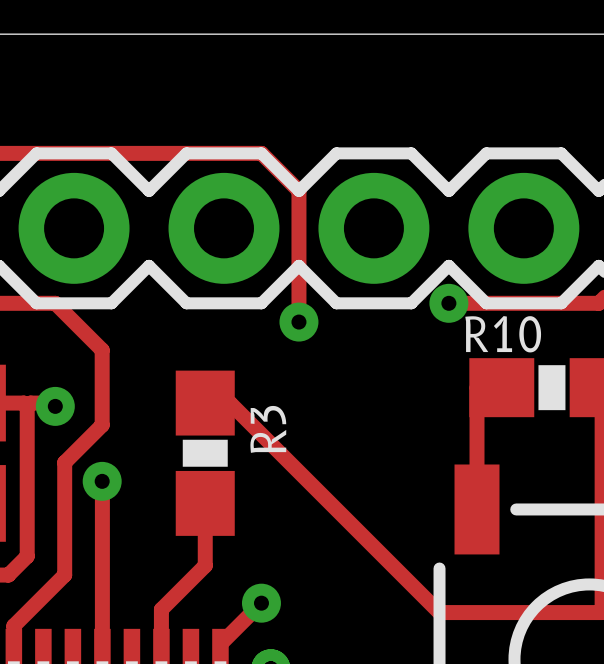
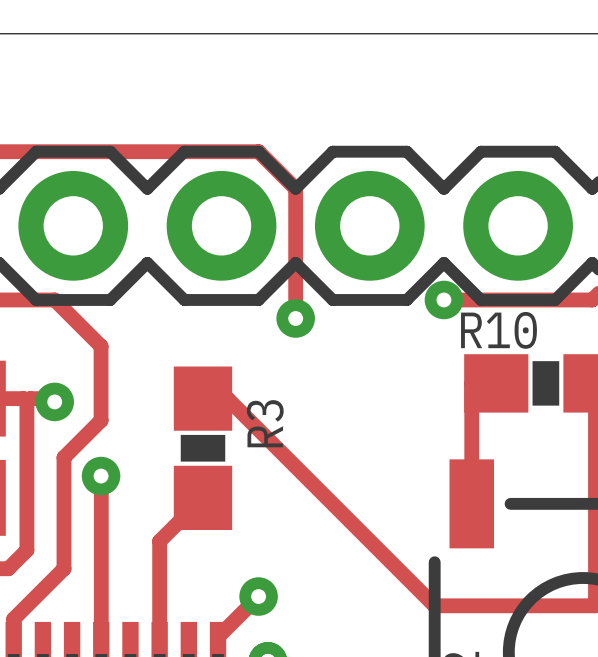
track: (205, 503) (205, 565) (161, 609) -> (202, 497) (159, 541) (159, 602)

